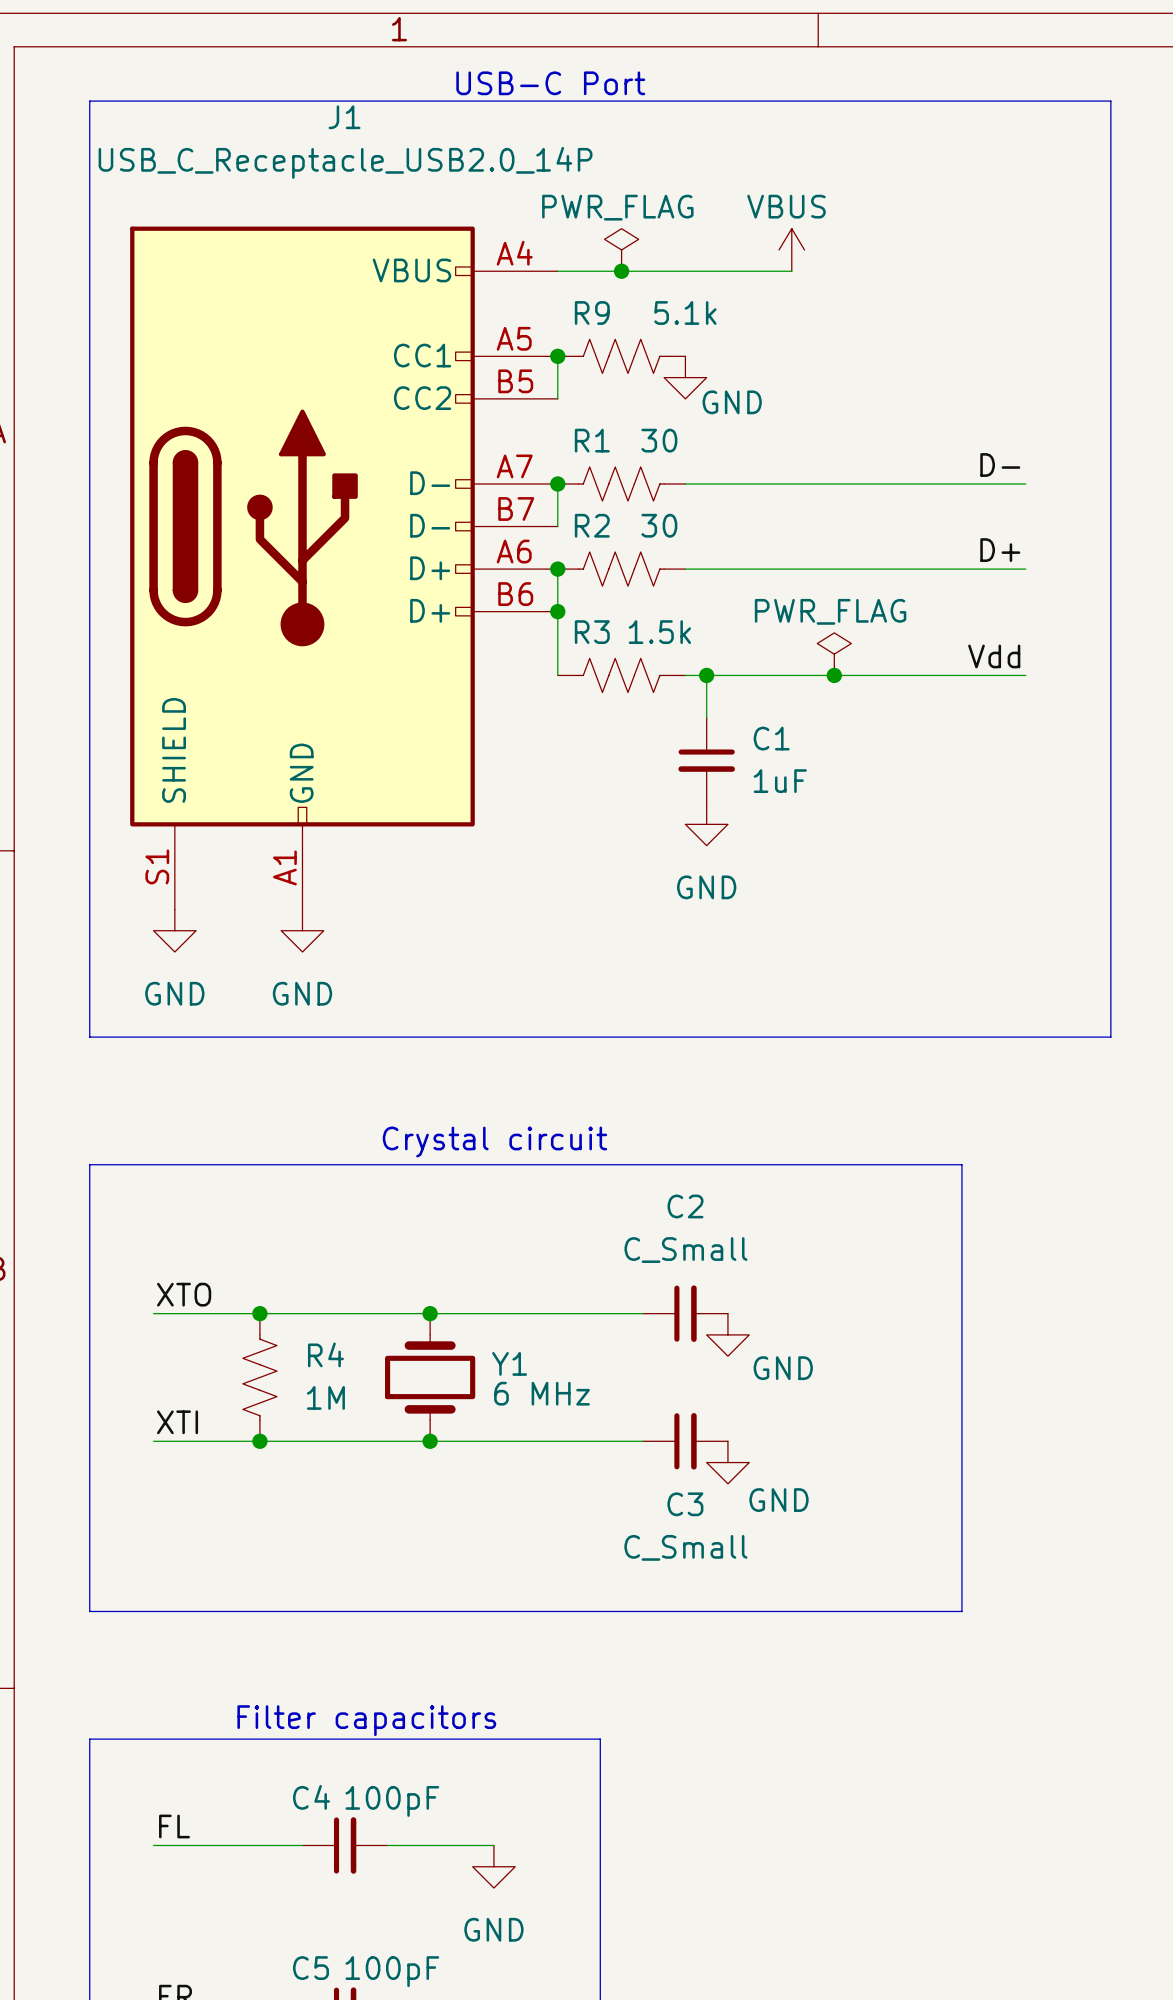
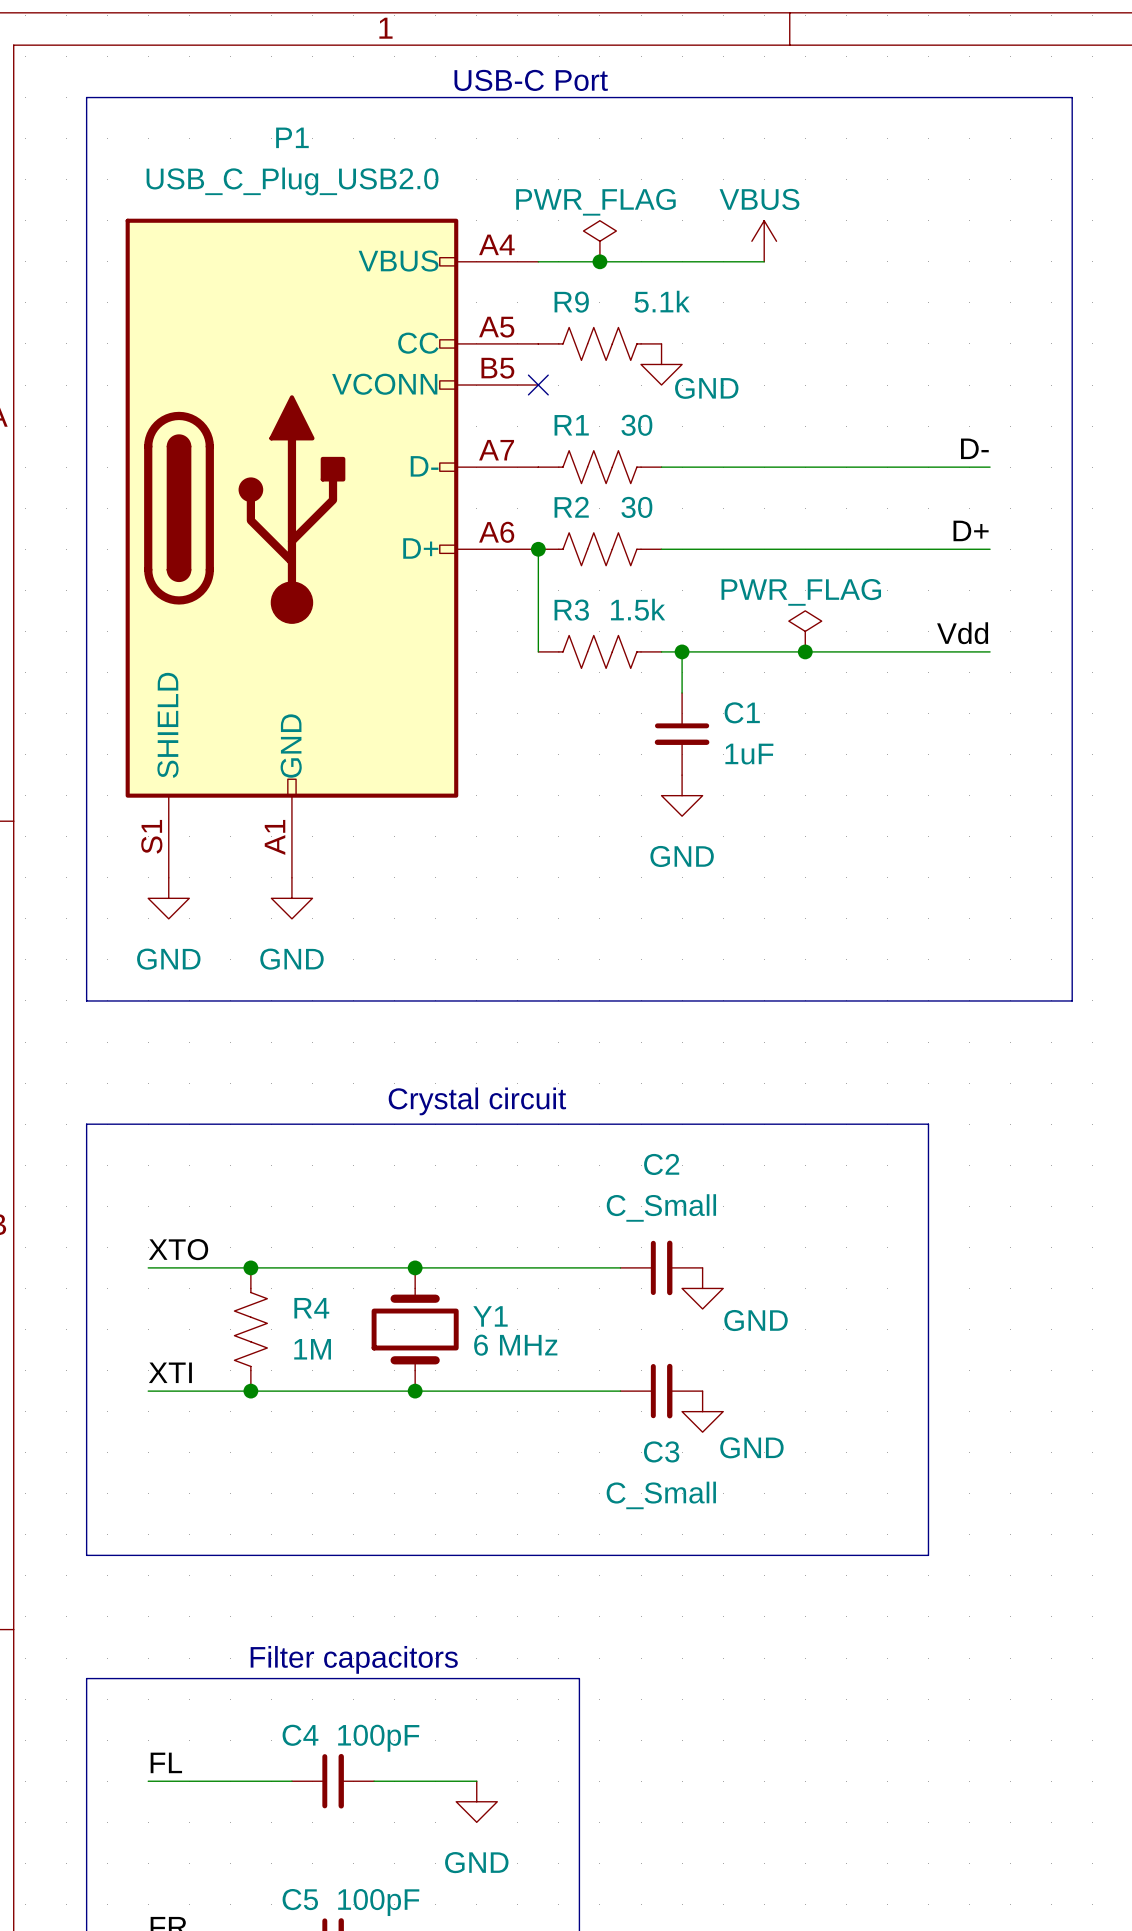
wire: (557, 356) (557, 398) -> none
junction: (557, 356) -> none
no-connect mark: none -> (538, 385)
wire: (557, 483) (557, 526) -> none
junction: (557, 483) -> none
J1: USB_C_Receptacle_USB2.0_14P (343, 568) -> none
P1: none -> USB_C_Plug_USB2.0 (331, 548)
junction: (557, 611) -> none

